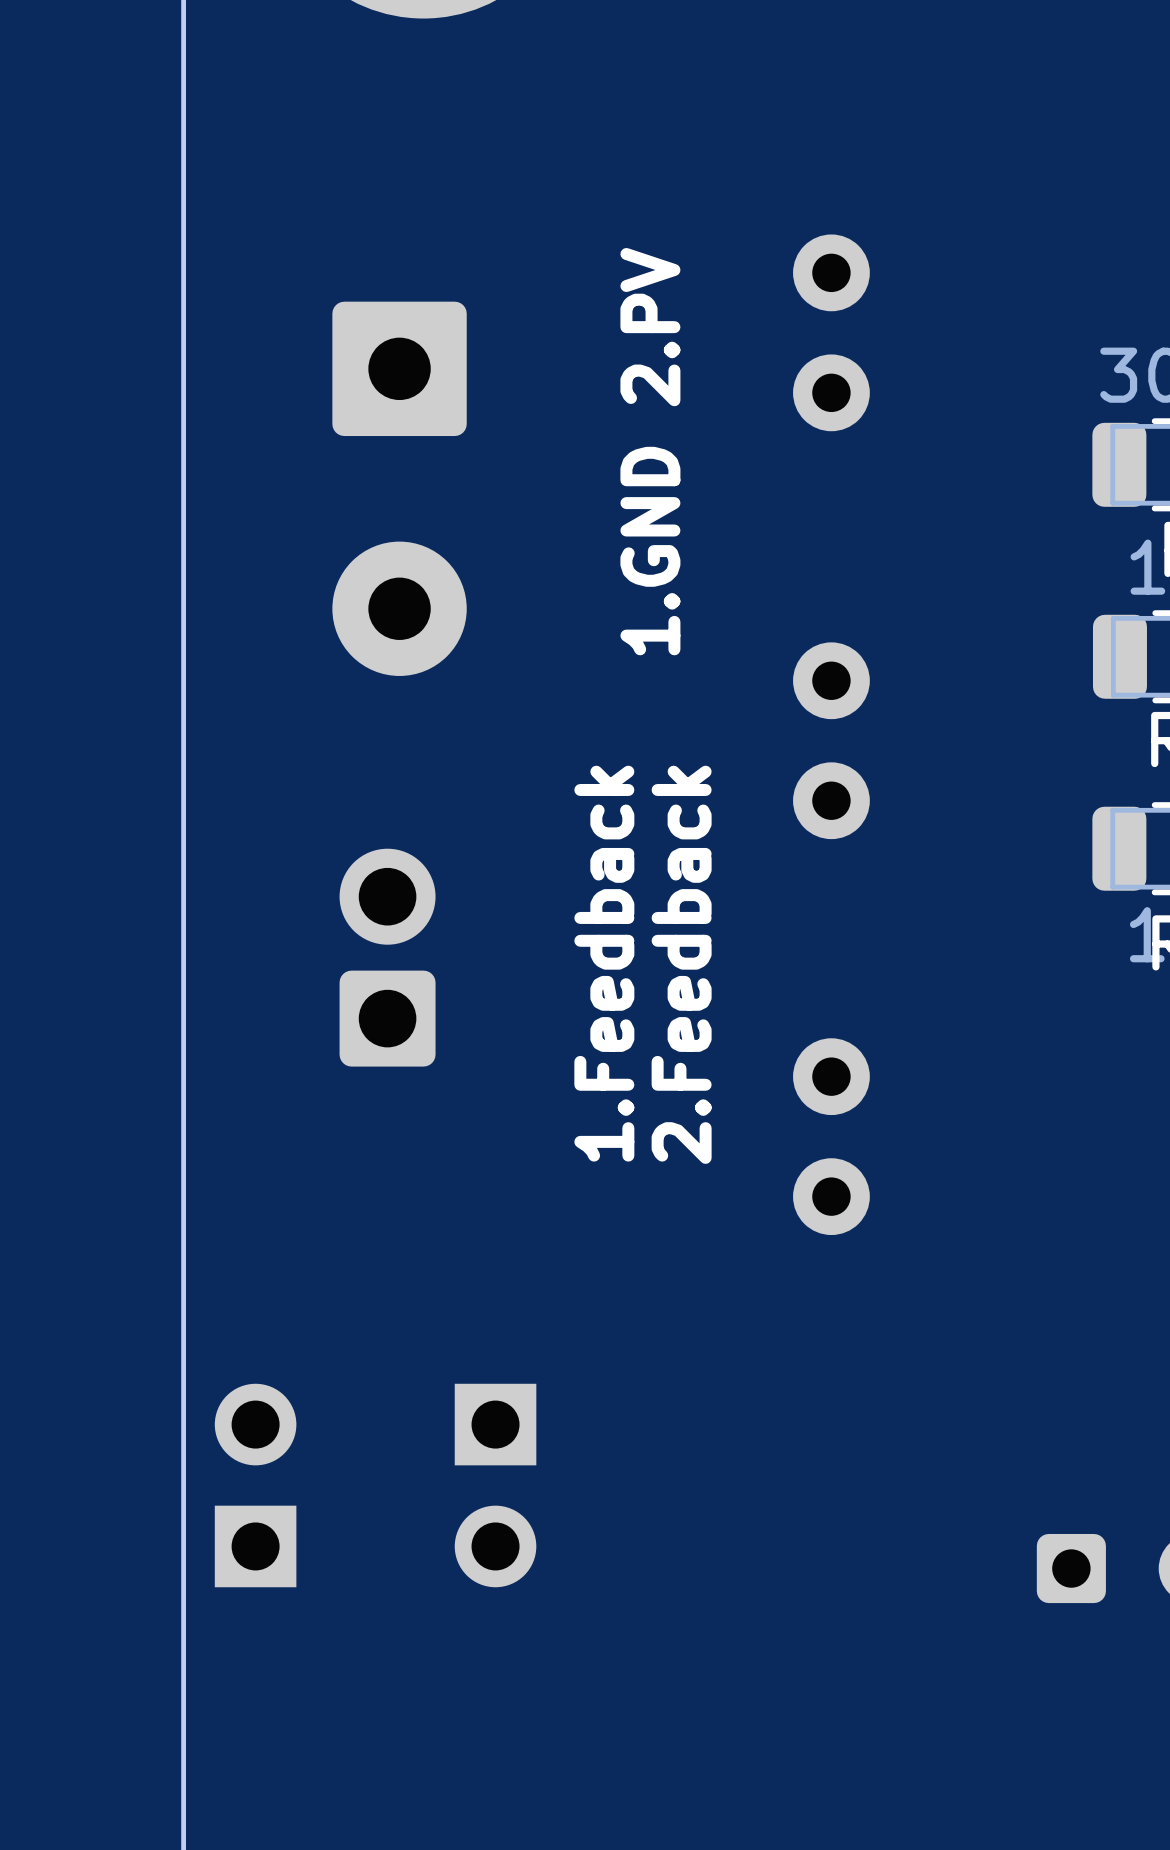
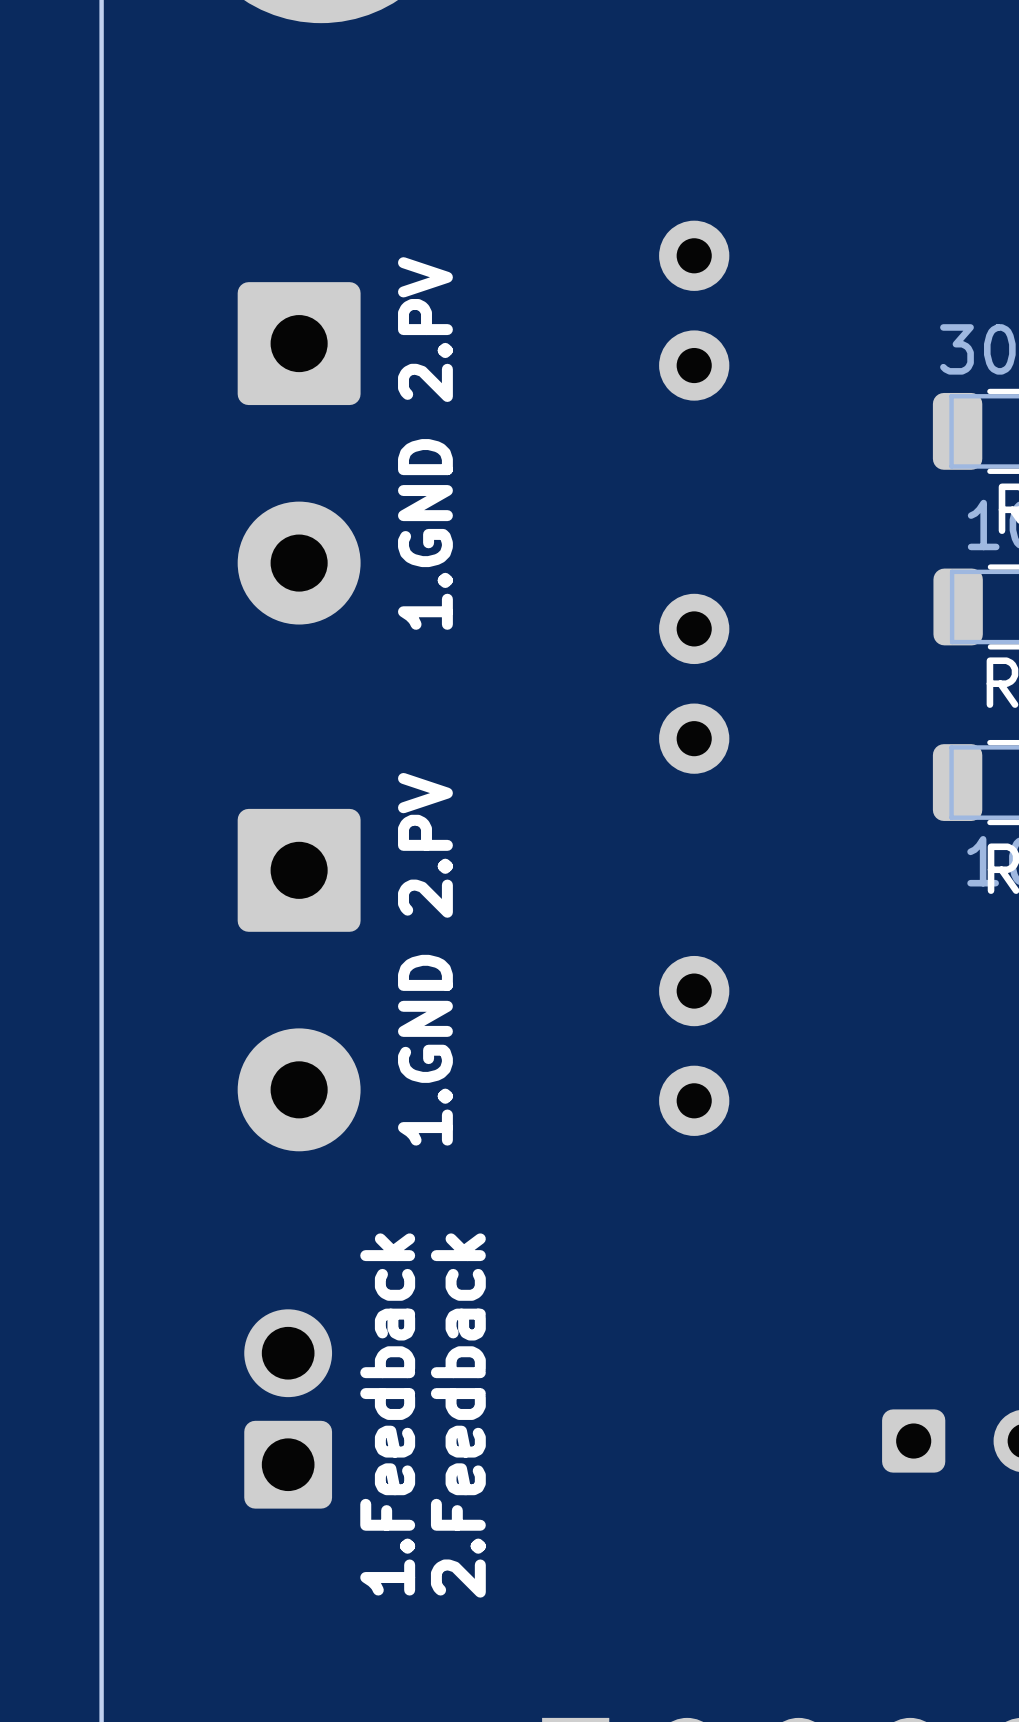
text position: 1.GND 2.PV (650, 451) -> 1.GND 2.PV (425, 443)
part position: (387, 957) -> (288, 1408)
text position: 1.Feedback (604, 963) -> 1.Feedback (387, 1414)
text position: 2.Feedback (681, 964) -> 2.Feedback (458, 1415)
text: none -> 1.GND 2.PV (425, 959)
part: none -> (299, 980)
part: (255, 1485) -> none
part: (495, 1485) -> none

